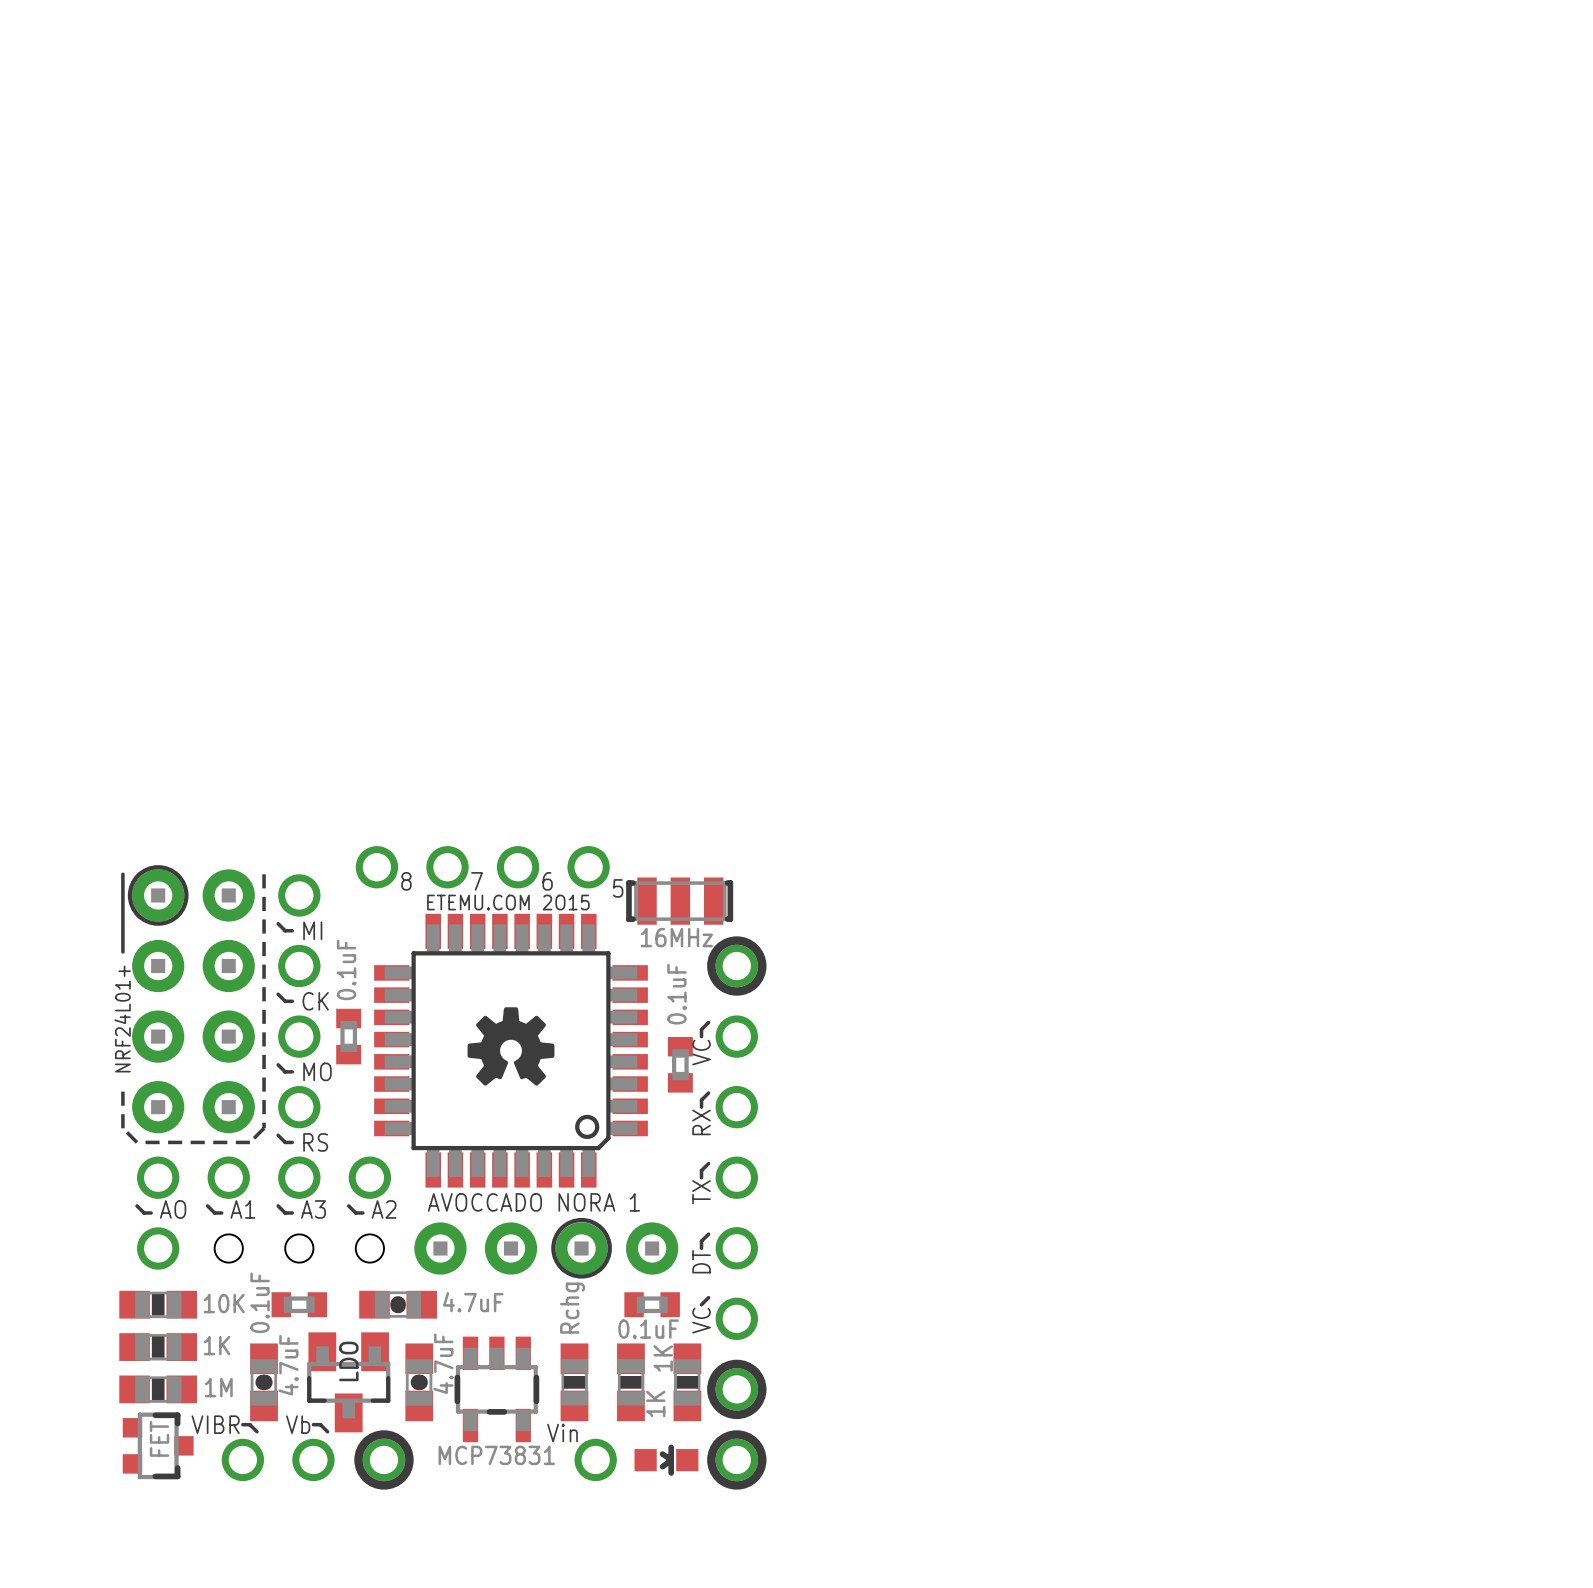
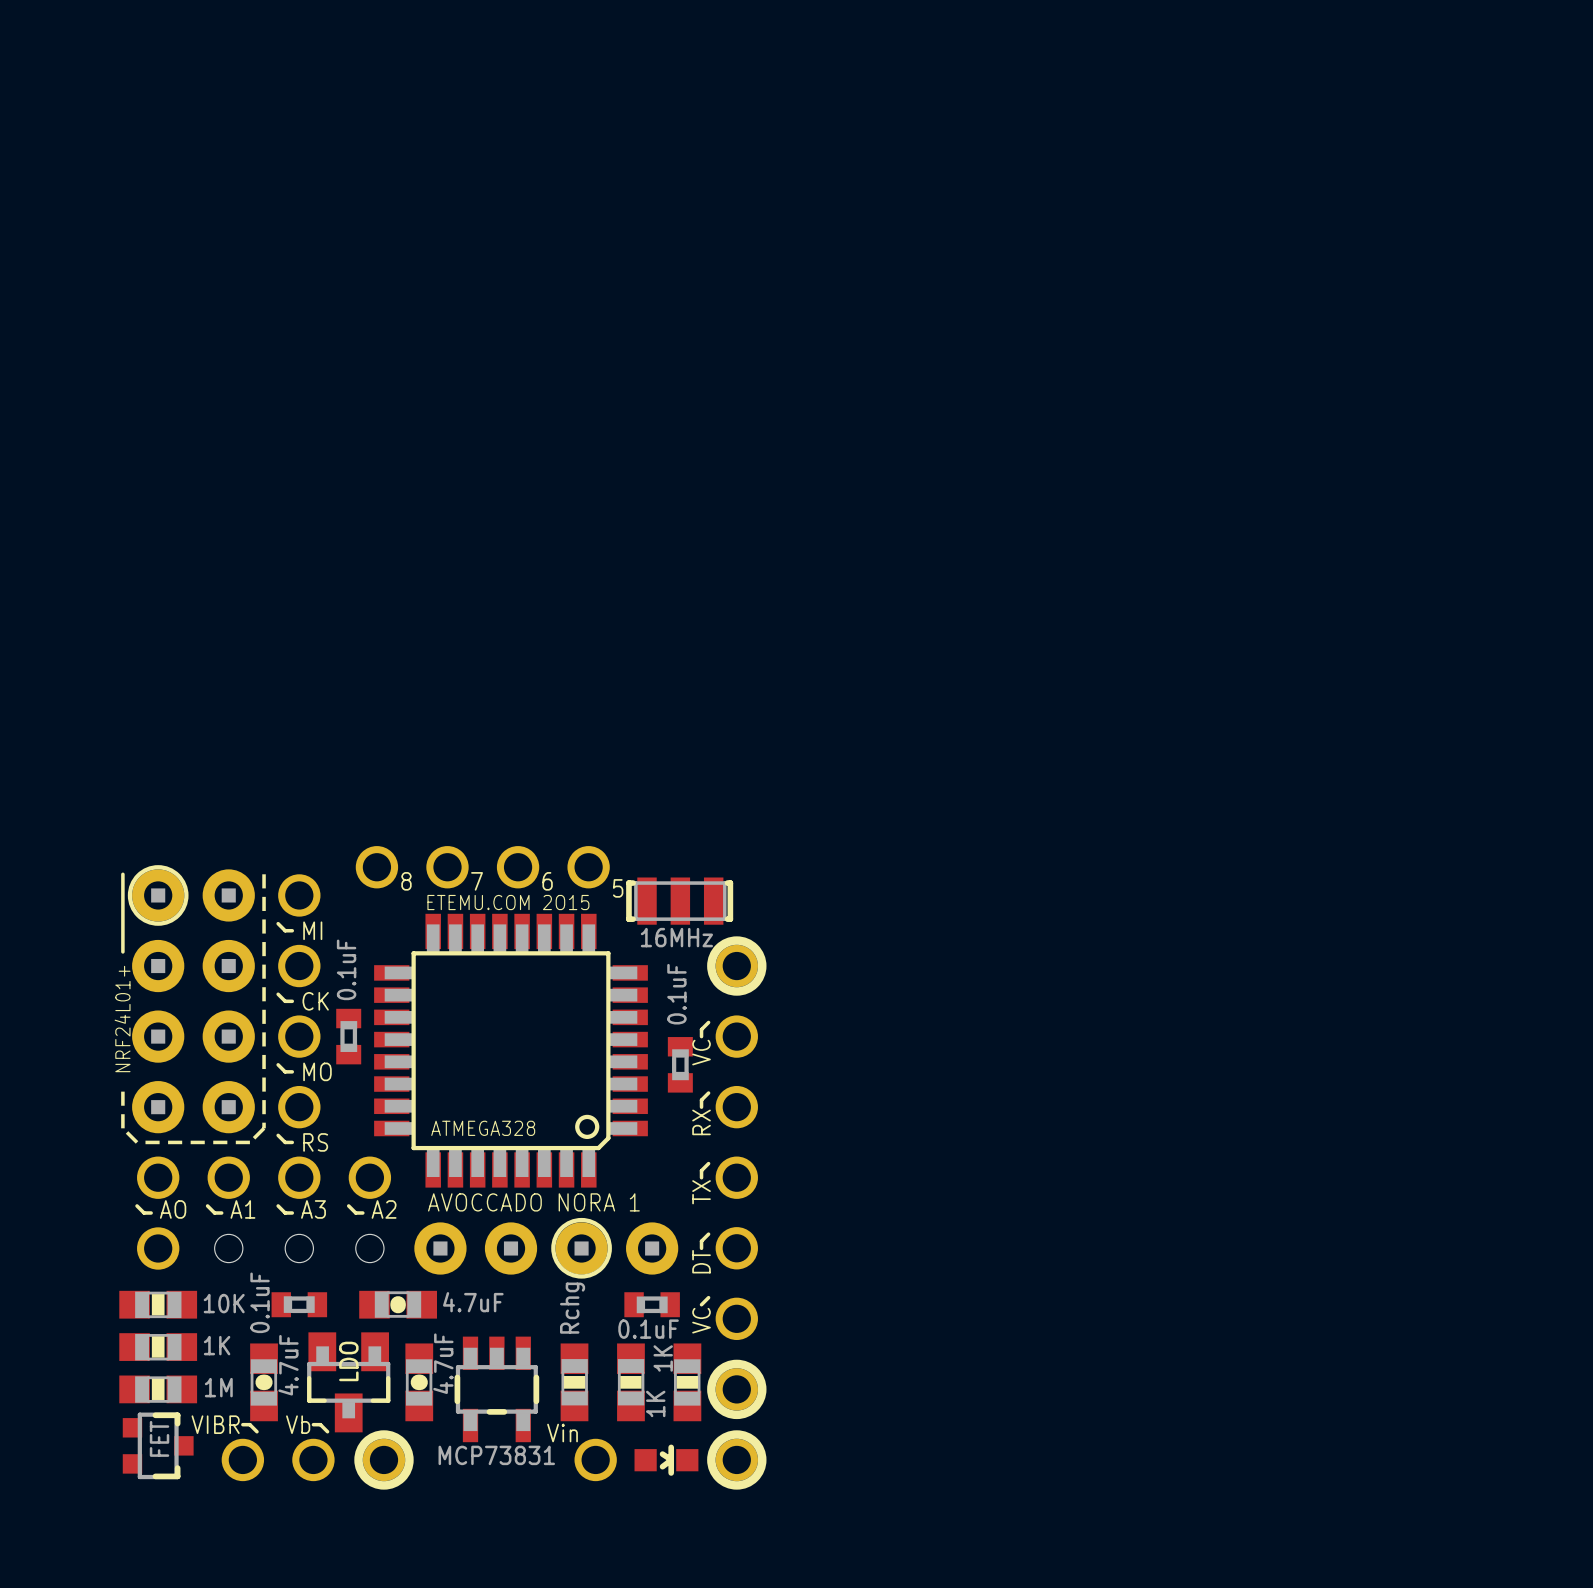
drawing: [467, 1007, 555, 1086] -> none
text: none -> ATMEGA328 (483, 1128)

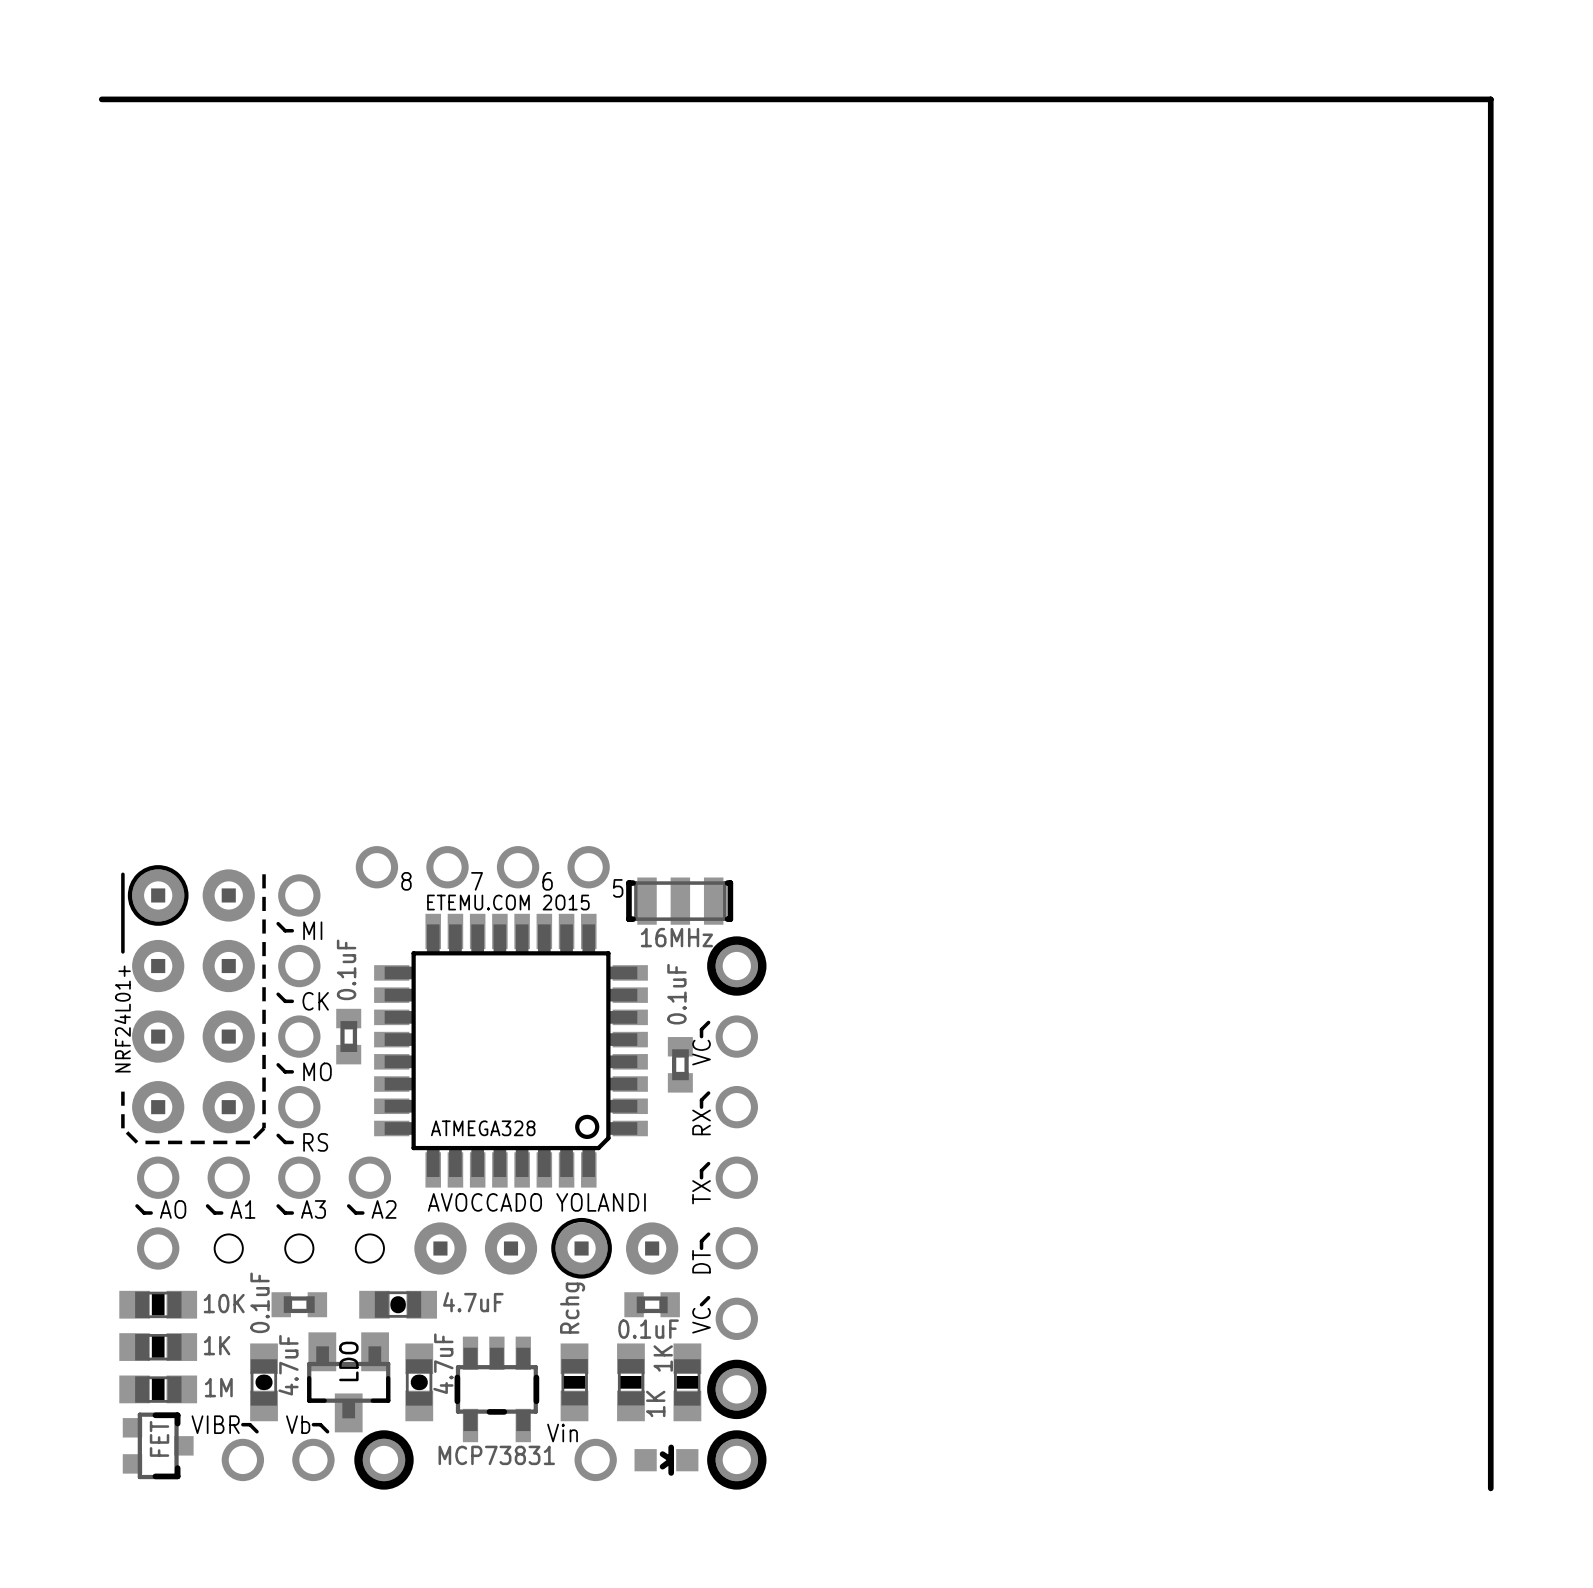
board edge: none -> (101, 99) (1490, 99) (1490, 1488)
text: AVOCCADO NORA 1 (533, 1202) -> AVOCCADO YOLANDI (536, 1202)

